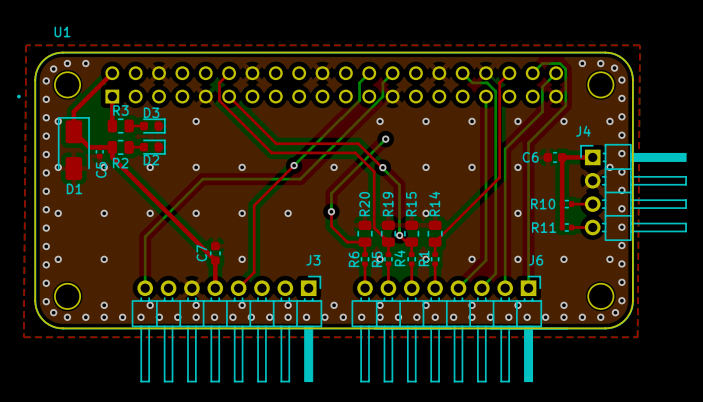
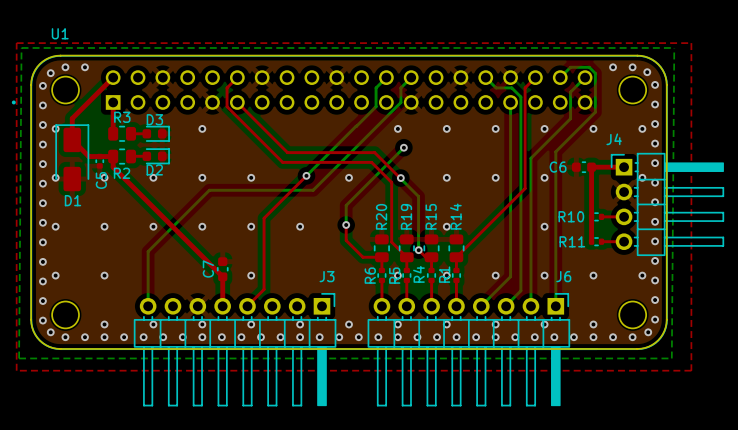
top zone outline: (26, 45) (23, 337) (637, 337) (639, 45) (26, 45) -> (16, 43) (16, 370) (691, 370) (691, 43) (16, 43)

